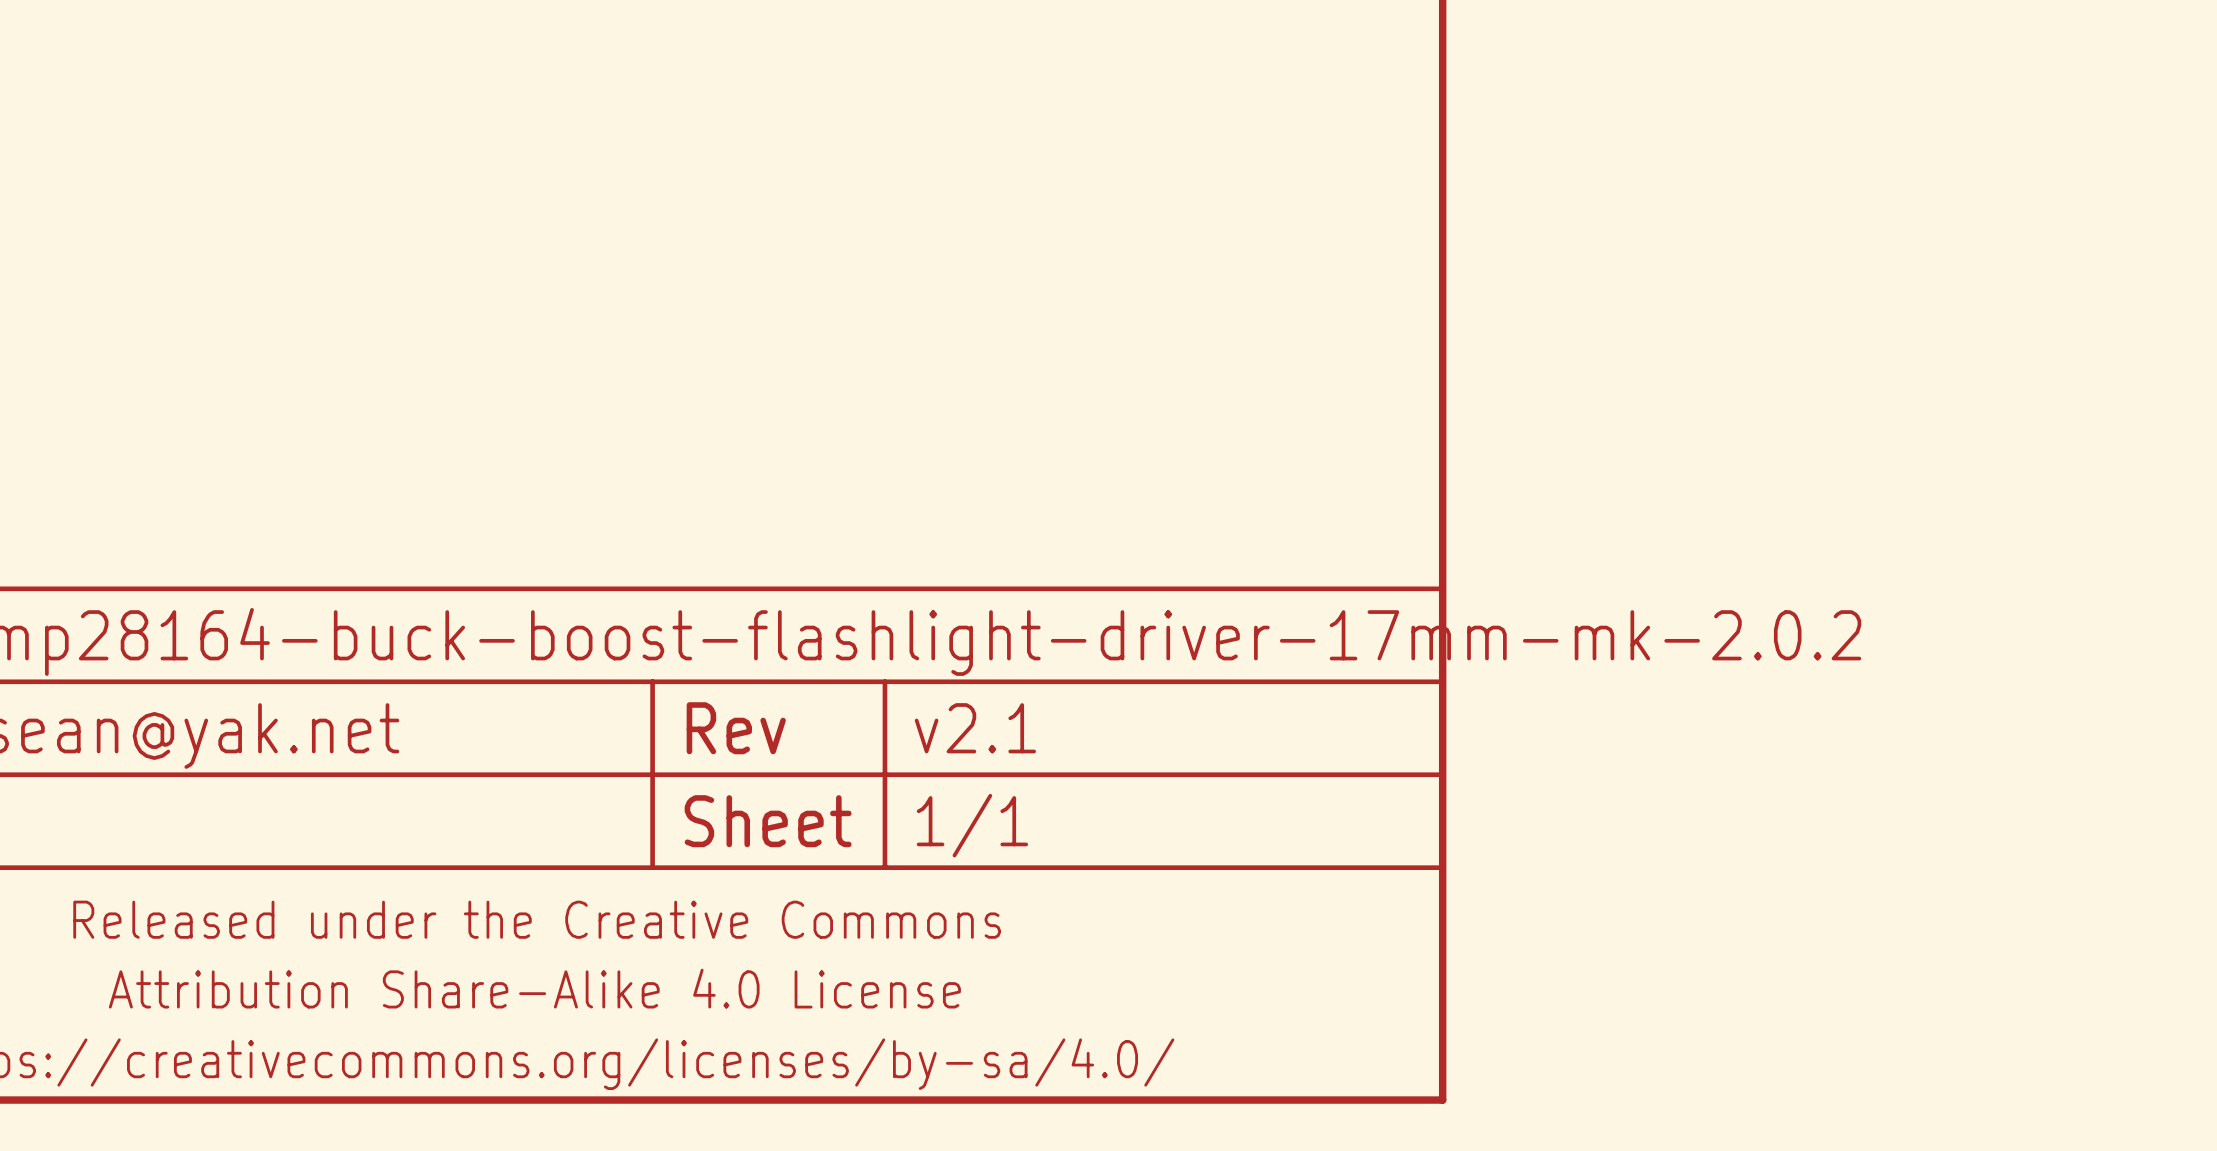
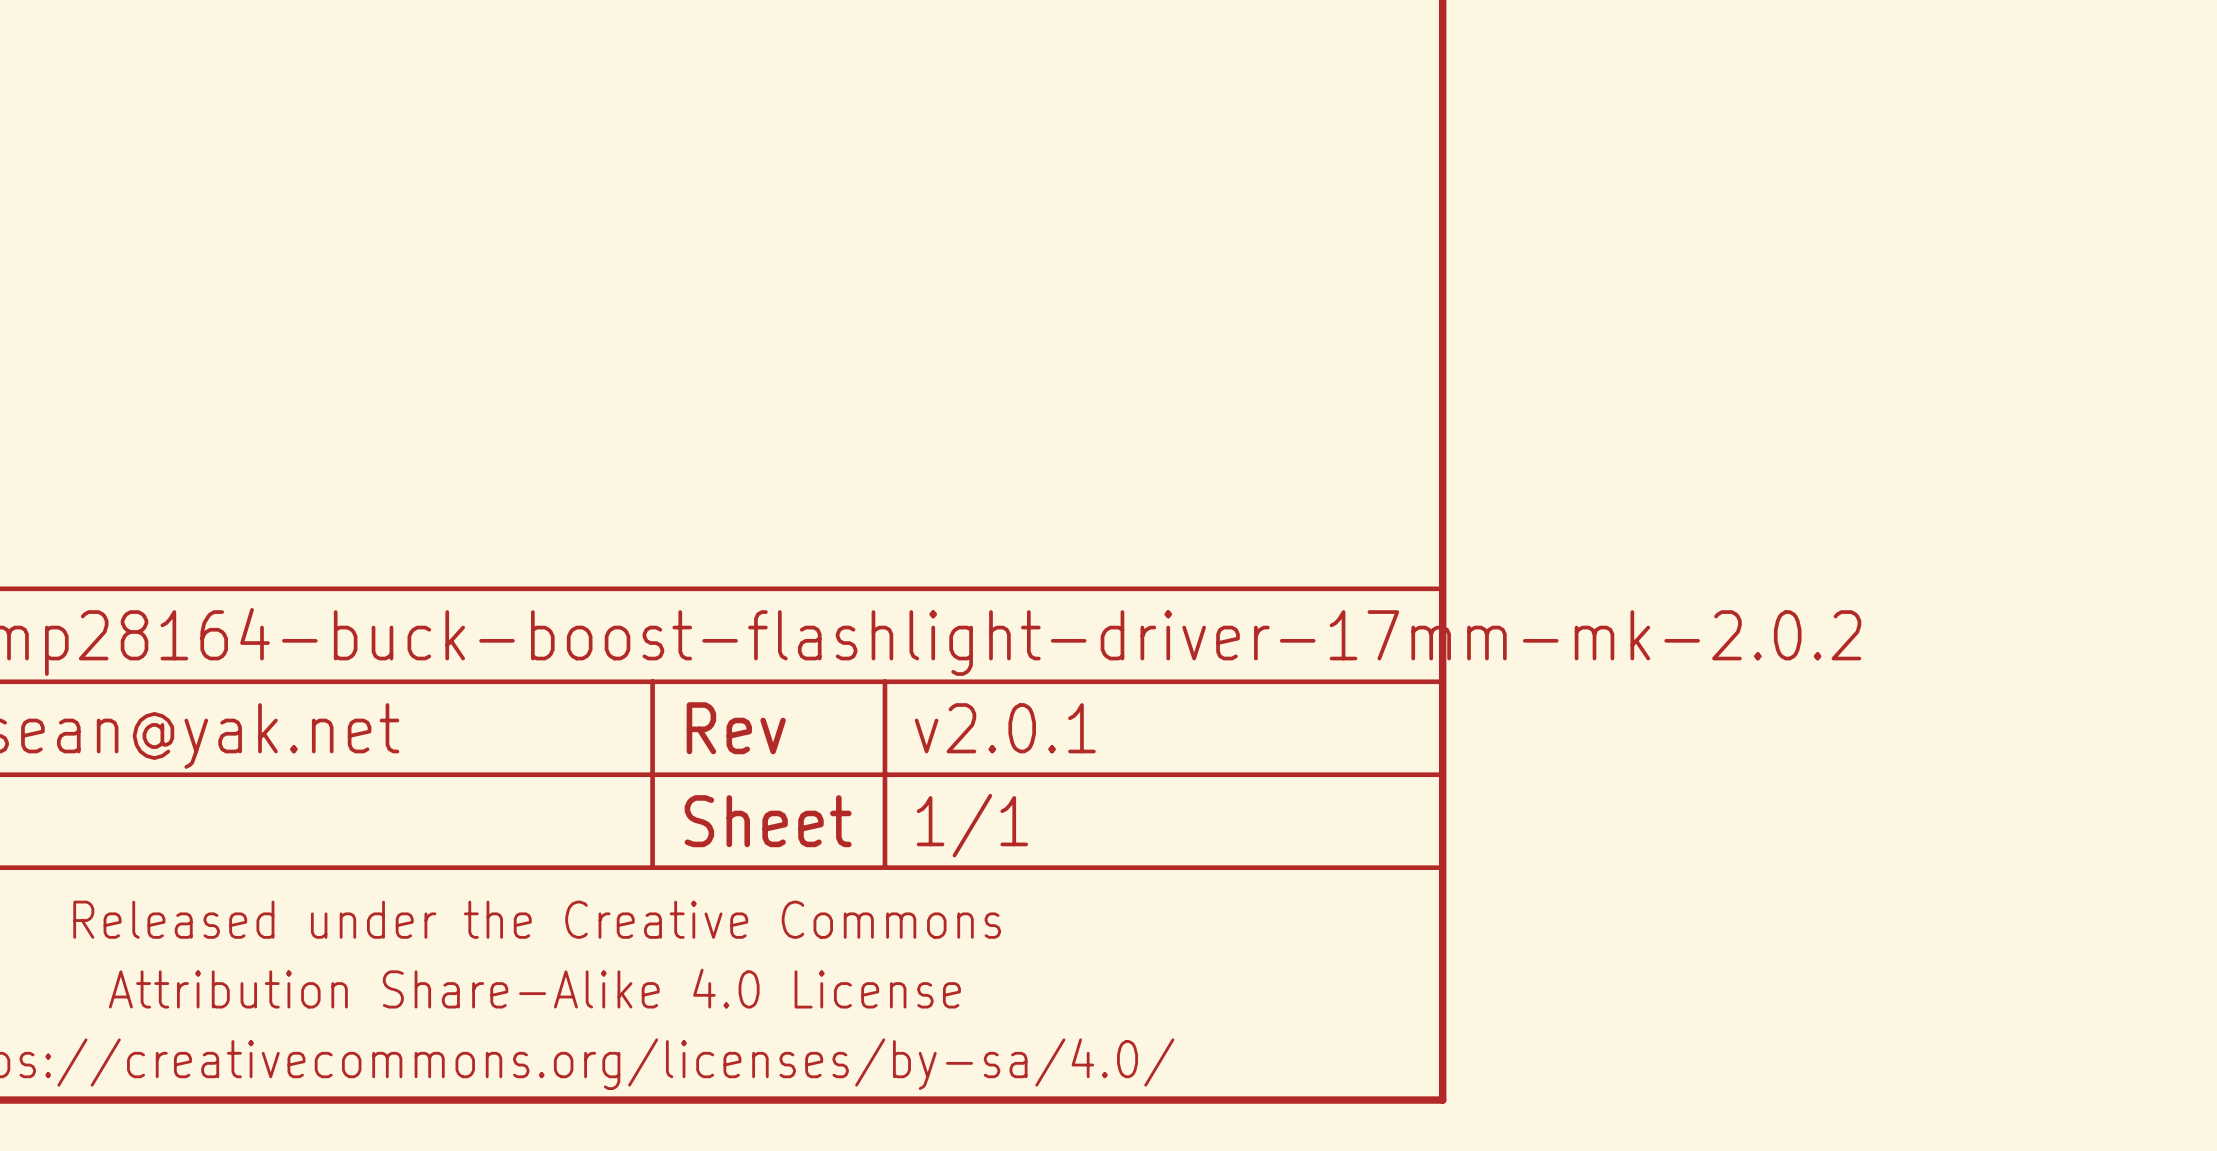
part text: v2.1 (975, 728) -> v2.0.1 (1005, 728)

